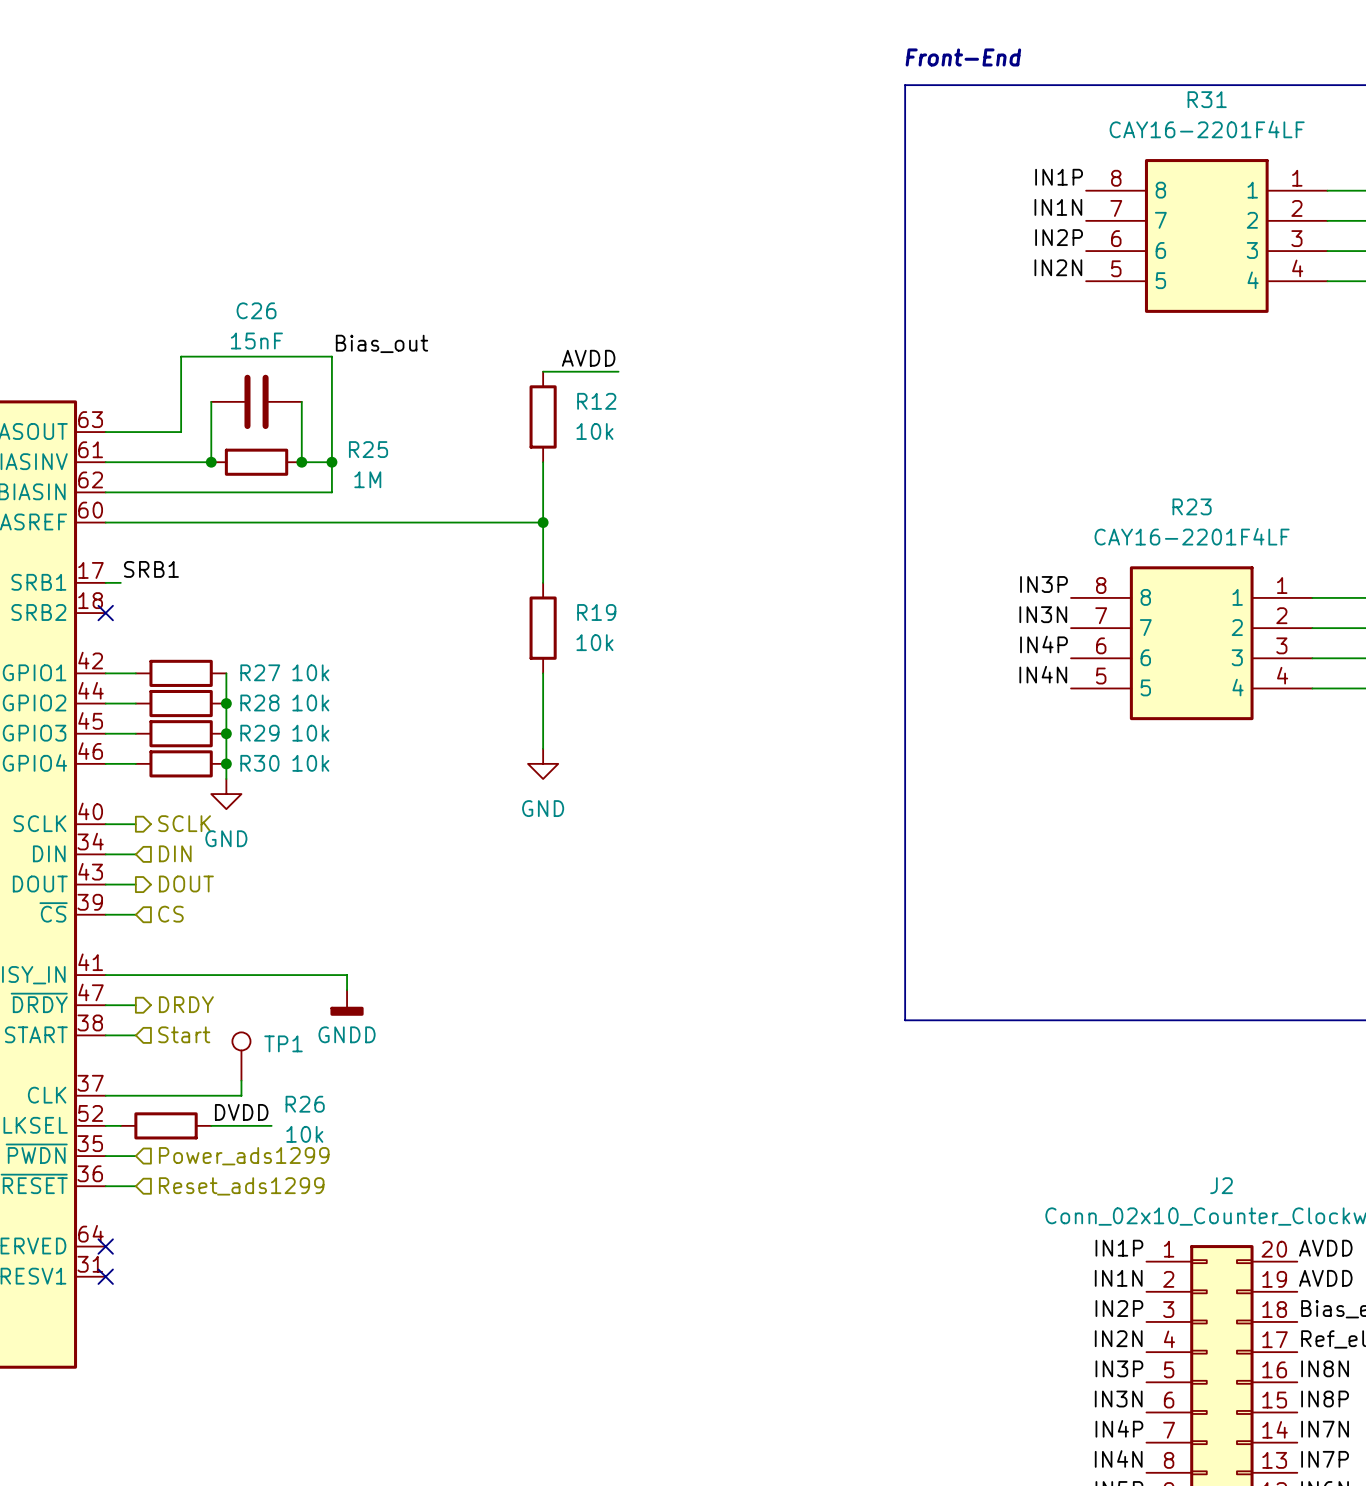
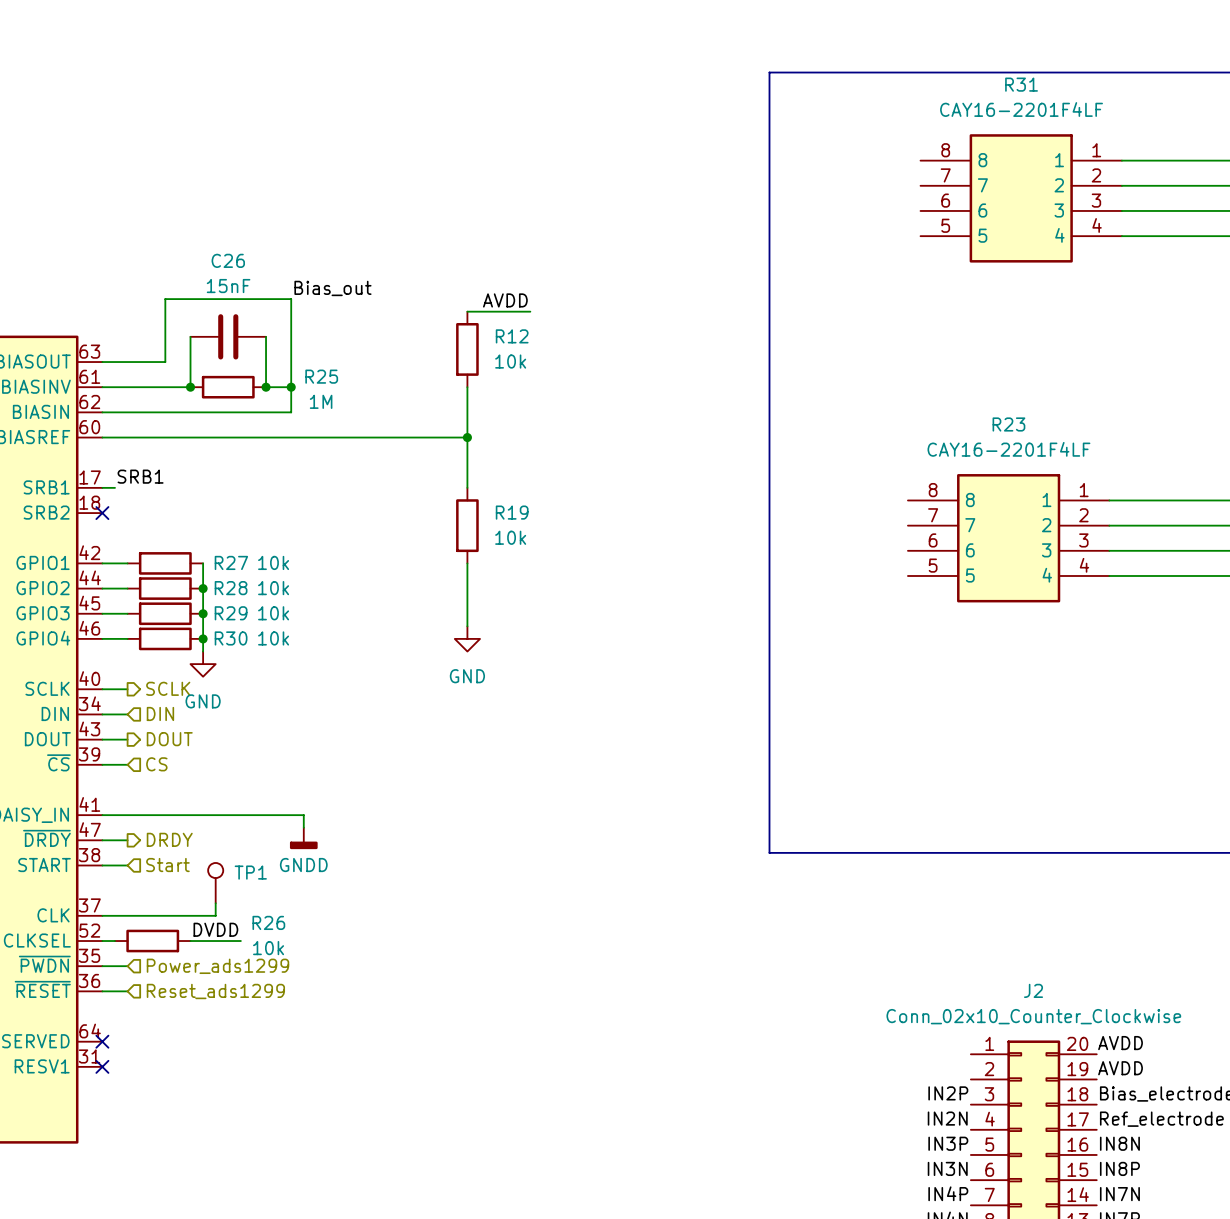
text: Front-End (963, 57) -> none
label: IN1P (1059, 177) -> none
label: IN1N (1058, 207) -> none
label: IN2P (1059, 237) -> none
label: IN2N (1058, 267) -> none
label: IN3P (1044, 584) -> none
label: IN3N (1043, 614) -> none
label: IN4P (1044, 644) -> none
label: IN4N (1043, 674) -> none
label: IN1P (1119, 1248) -> none
label: IN1N (1118, 1278) -> none

